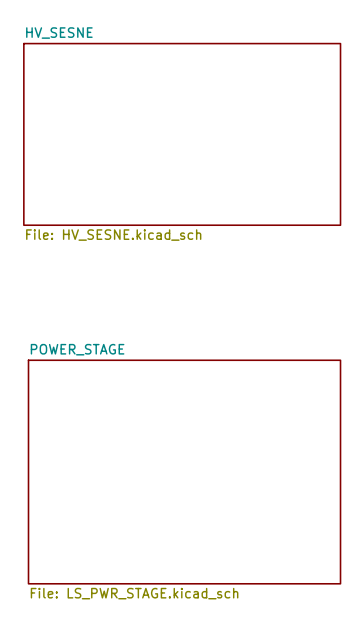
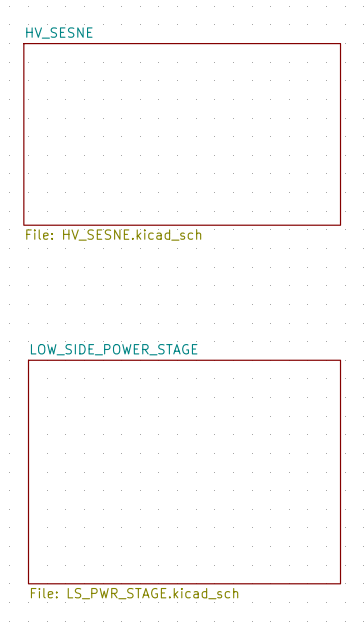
sheet POWER_STAGE name: POWER_STAGE (77, 349) -> LOW_SIDE_POWER_STAGE (114, 349)

